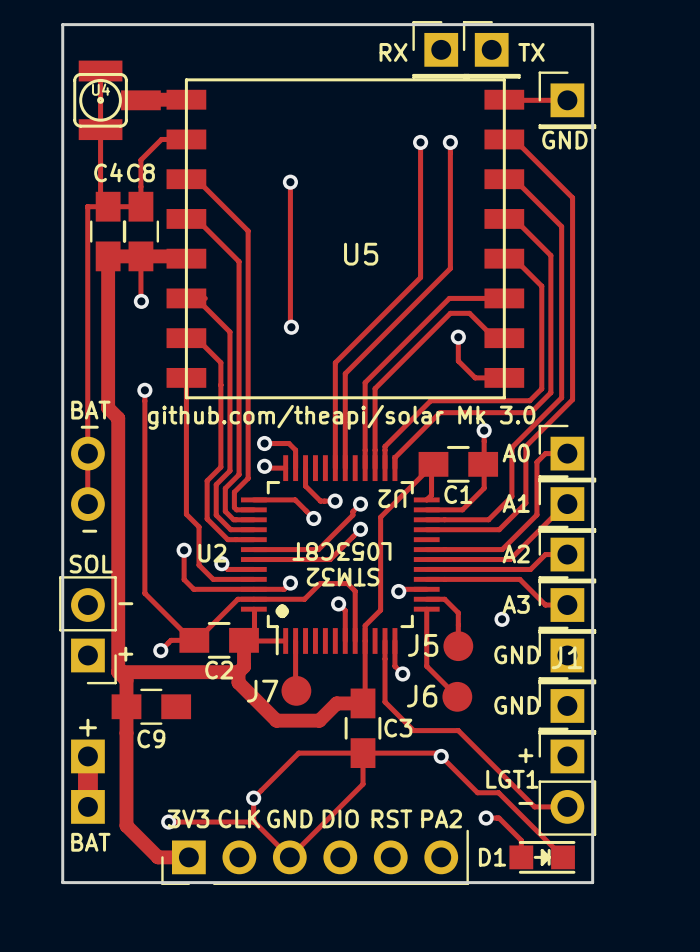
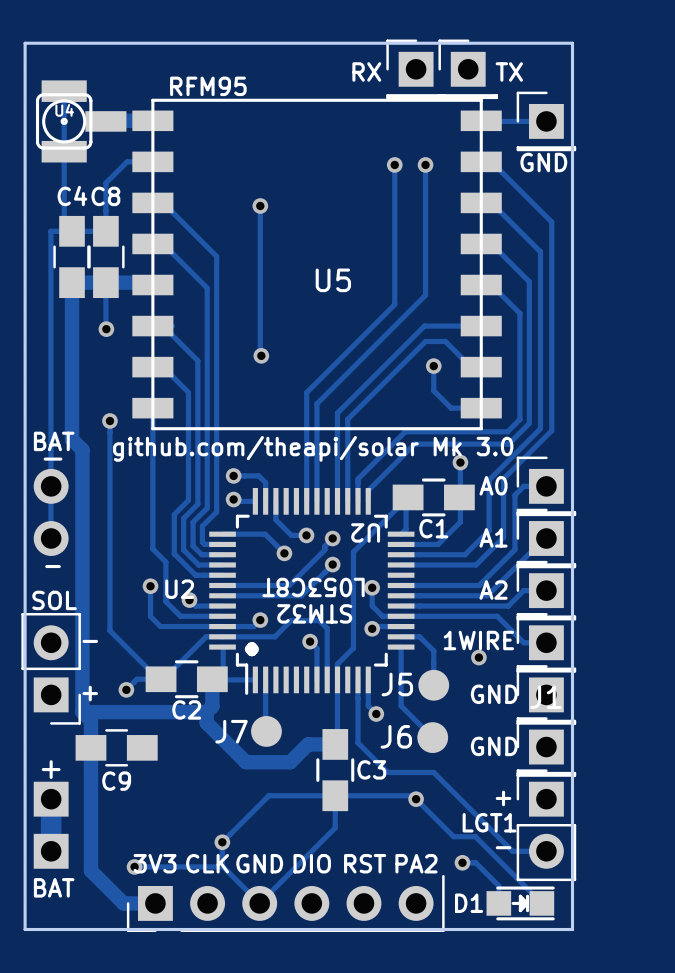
text: none -> RFM95 (208, 86)
track: none -> (372, 587) (372, 605) (382, 616) (401, 616)
via: none -> (372, 587)
text: none -> 1WIRE (478, 640)
A3 name: A3 (516, 604) -> none

